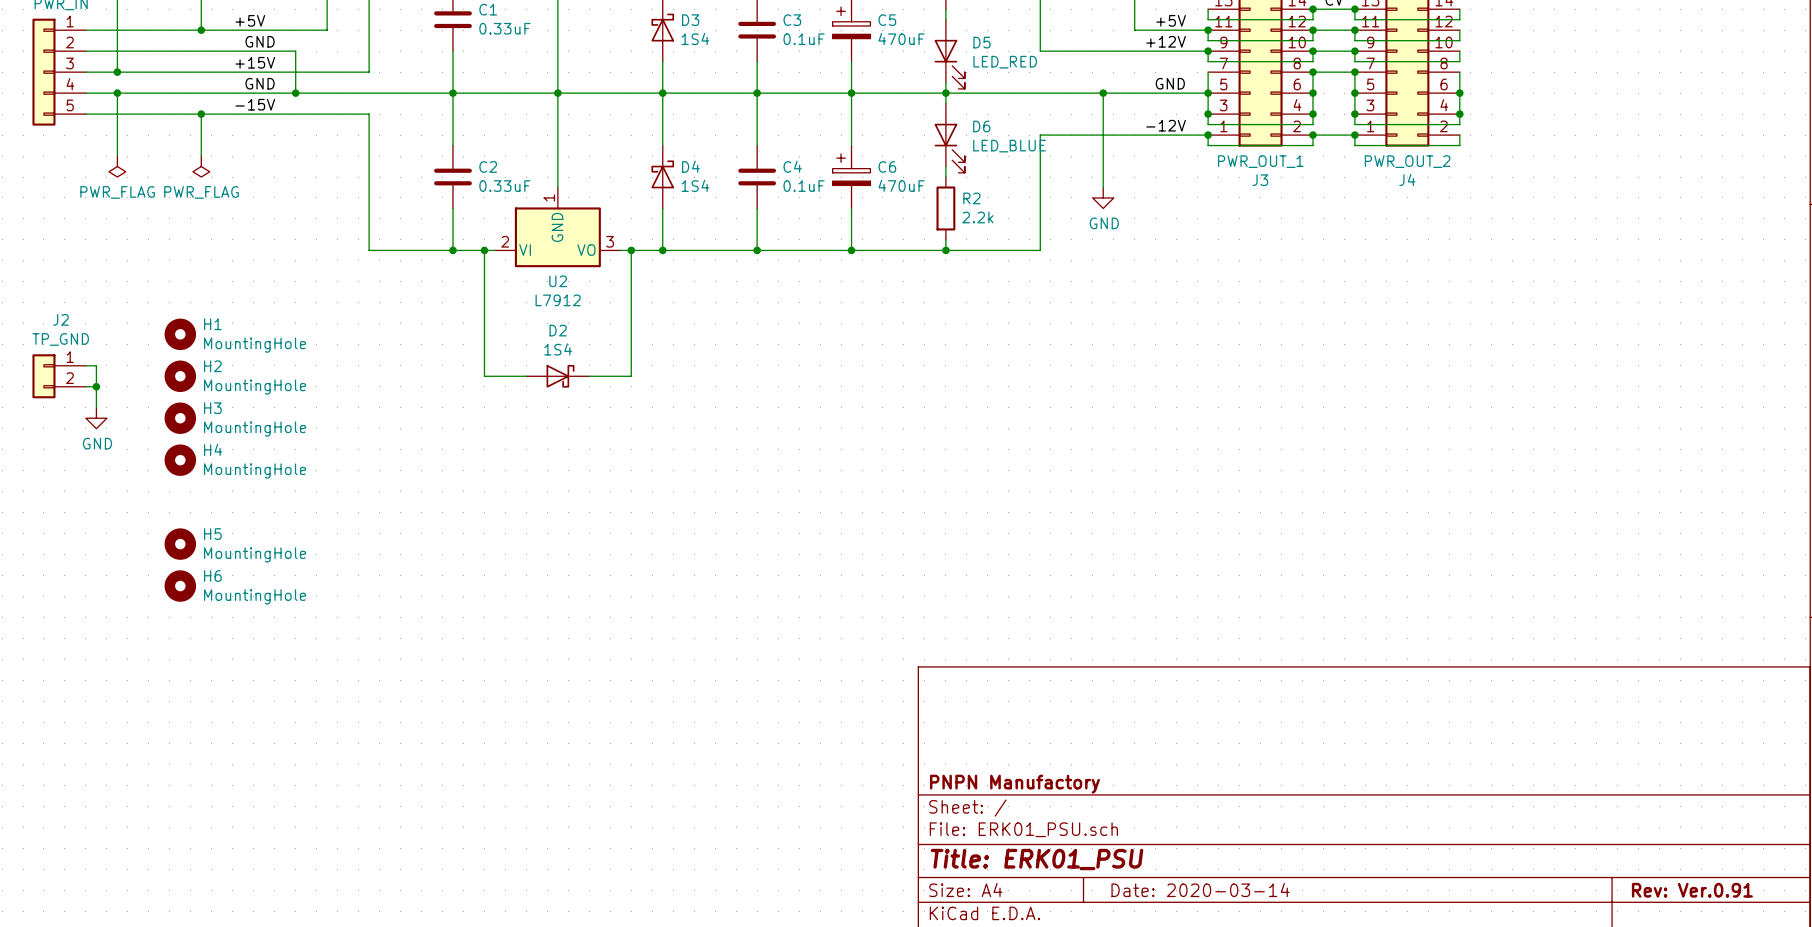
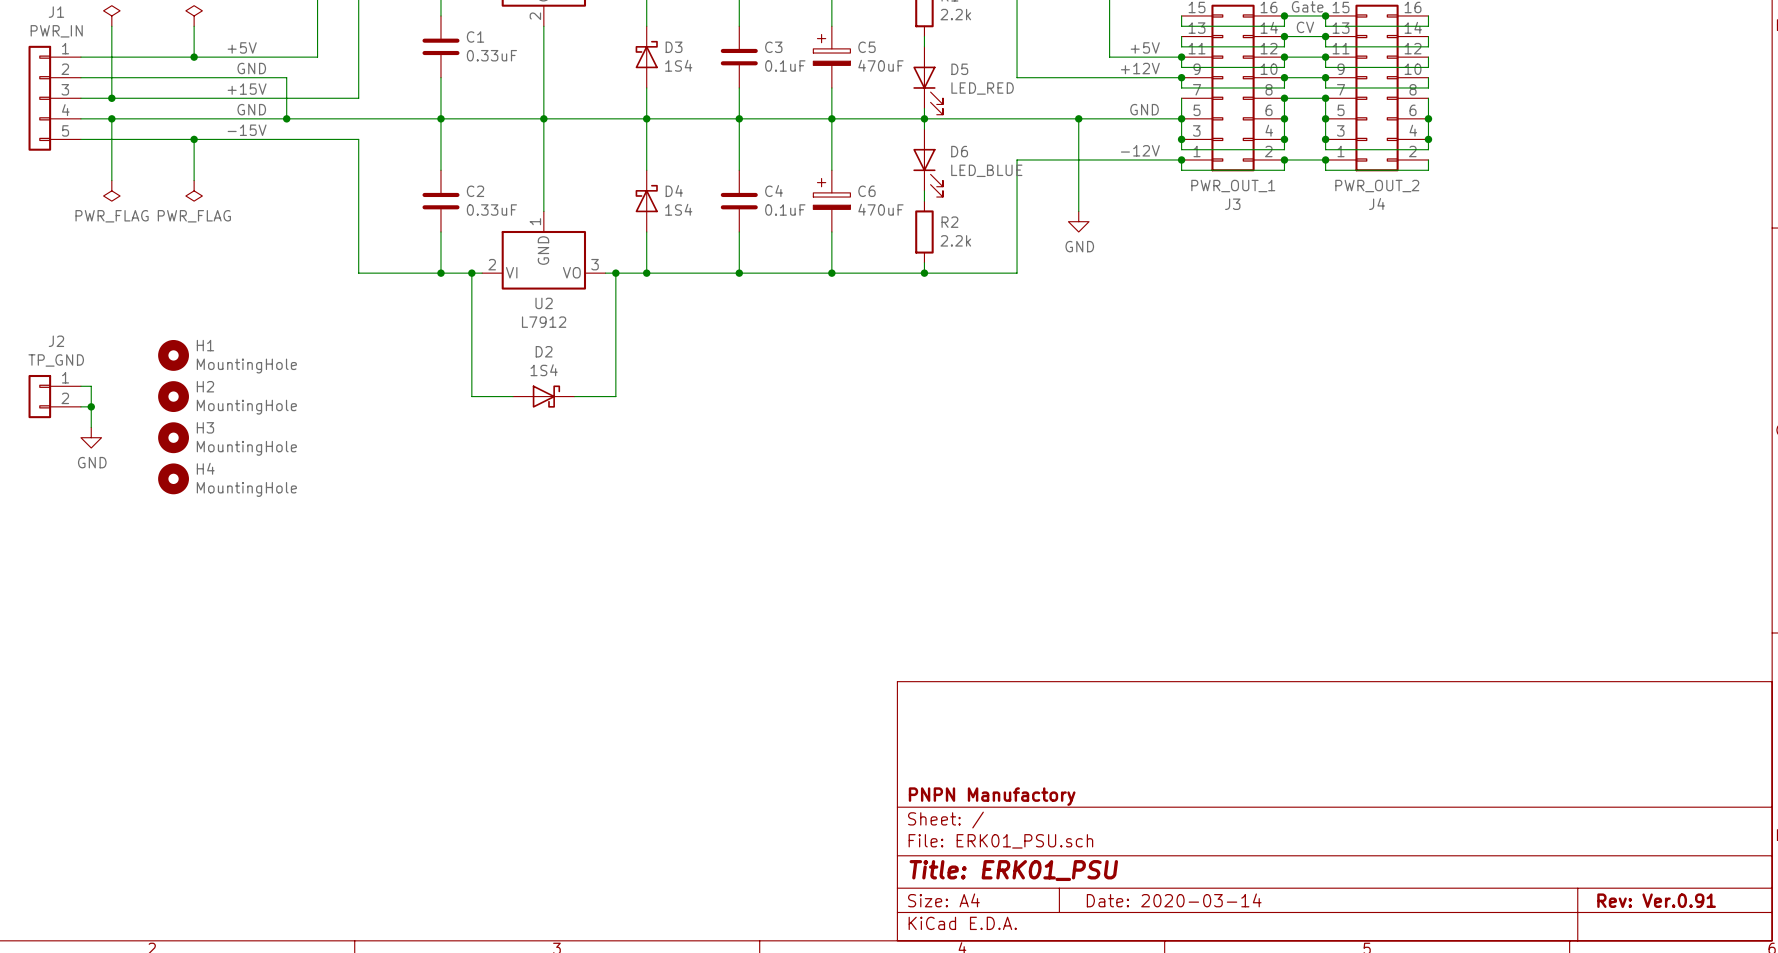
H5: MountingHole (180, 544) -> none
H6: MountingHole (180, 586) -> none

